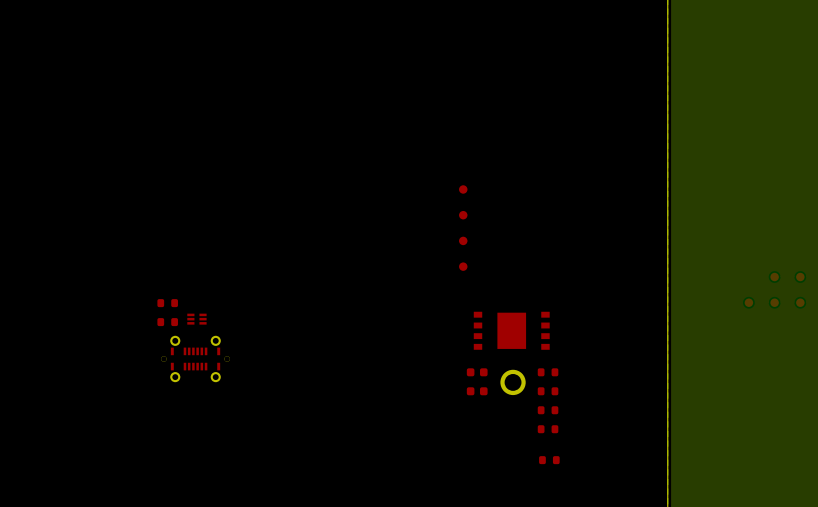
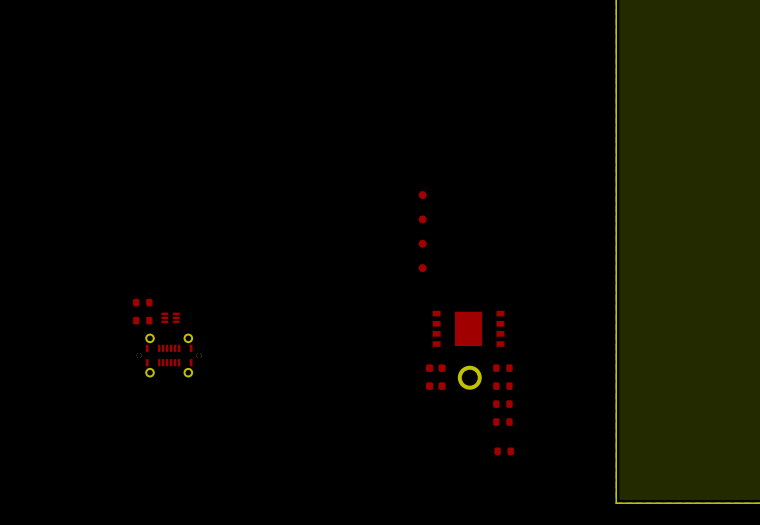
part: (774, 277) -> none
part: (800, 277) -> none
part: (748, 302) -> none
part: (774, 302) -> none
part: (800, 302) -> none

